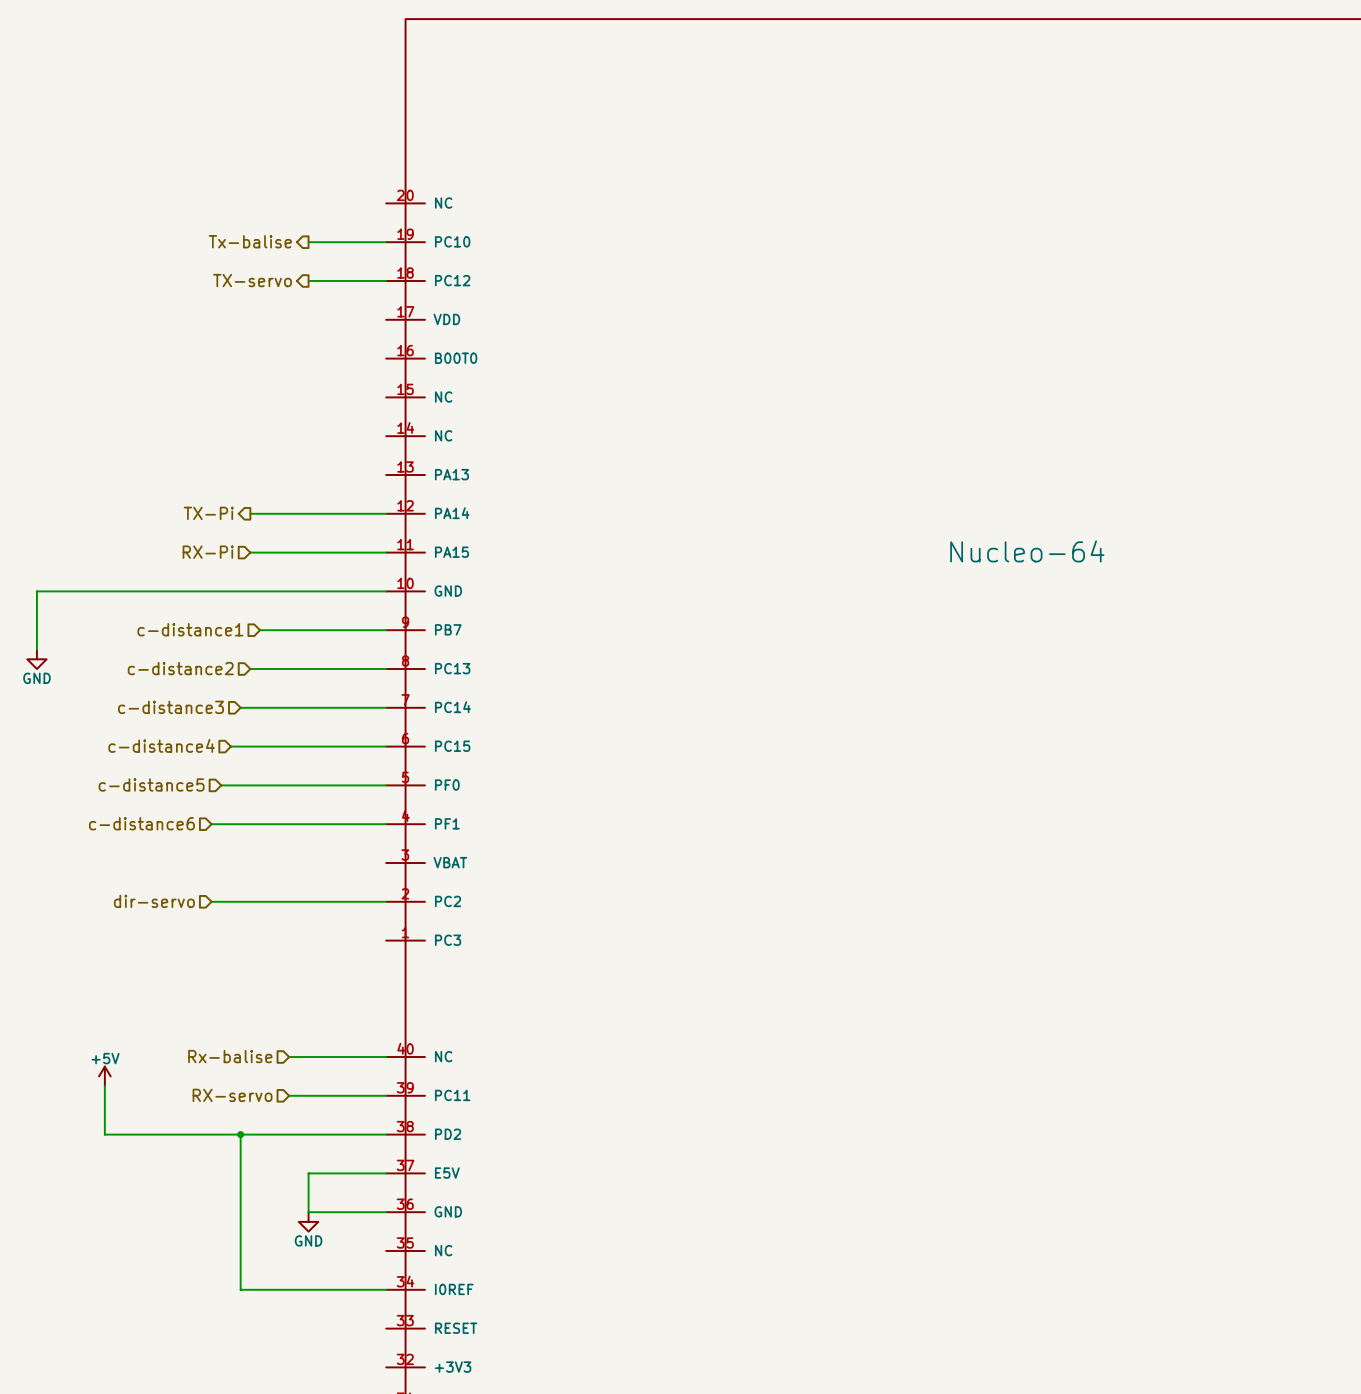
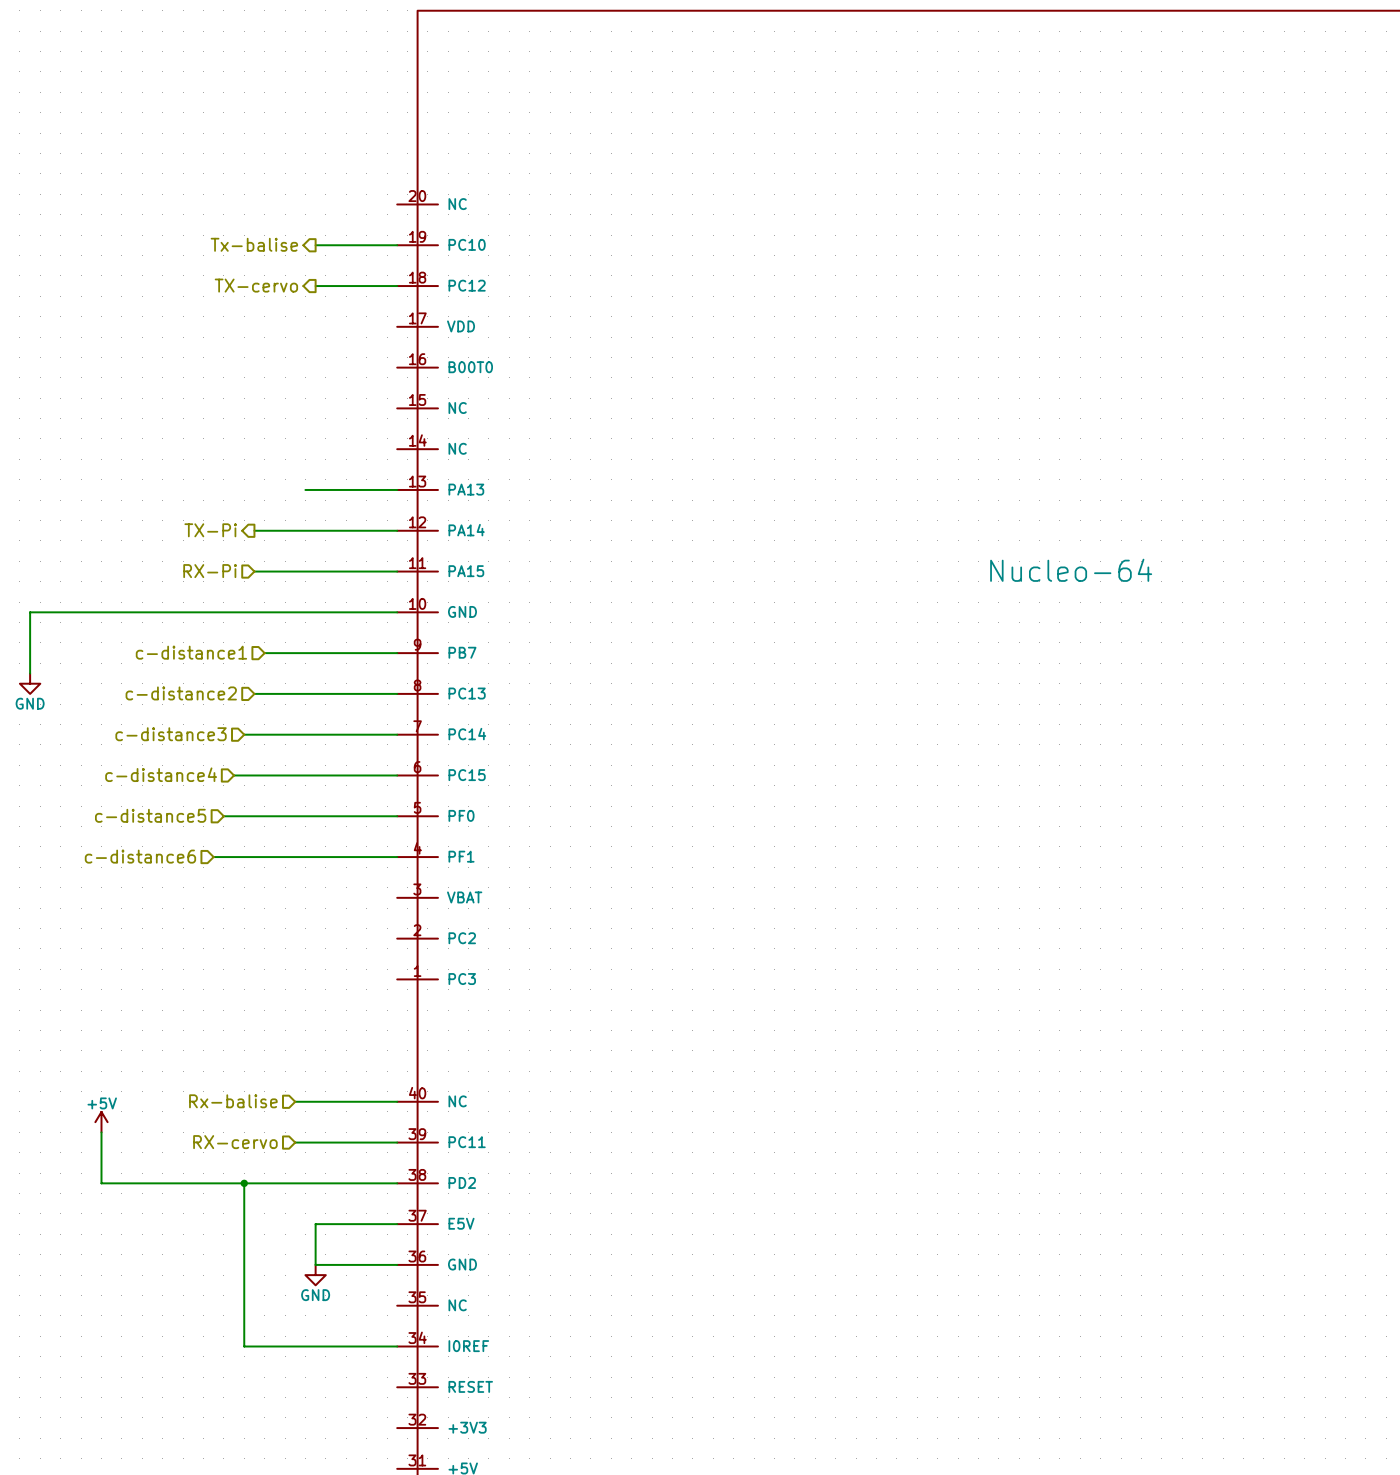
hierarchical label: TX-servo (252, 280) -> TX-cervo (256, 285)
wire: none -> (305, 489) (397, 489)
hierarchical label: dir-servo (154, 901) -> none
wire: (211, 901) (386, 901) -> none
hierarchical label: RX-servo (232, 1095) -> RX-cervo (235, 1142)

